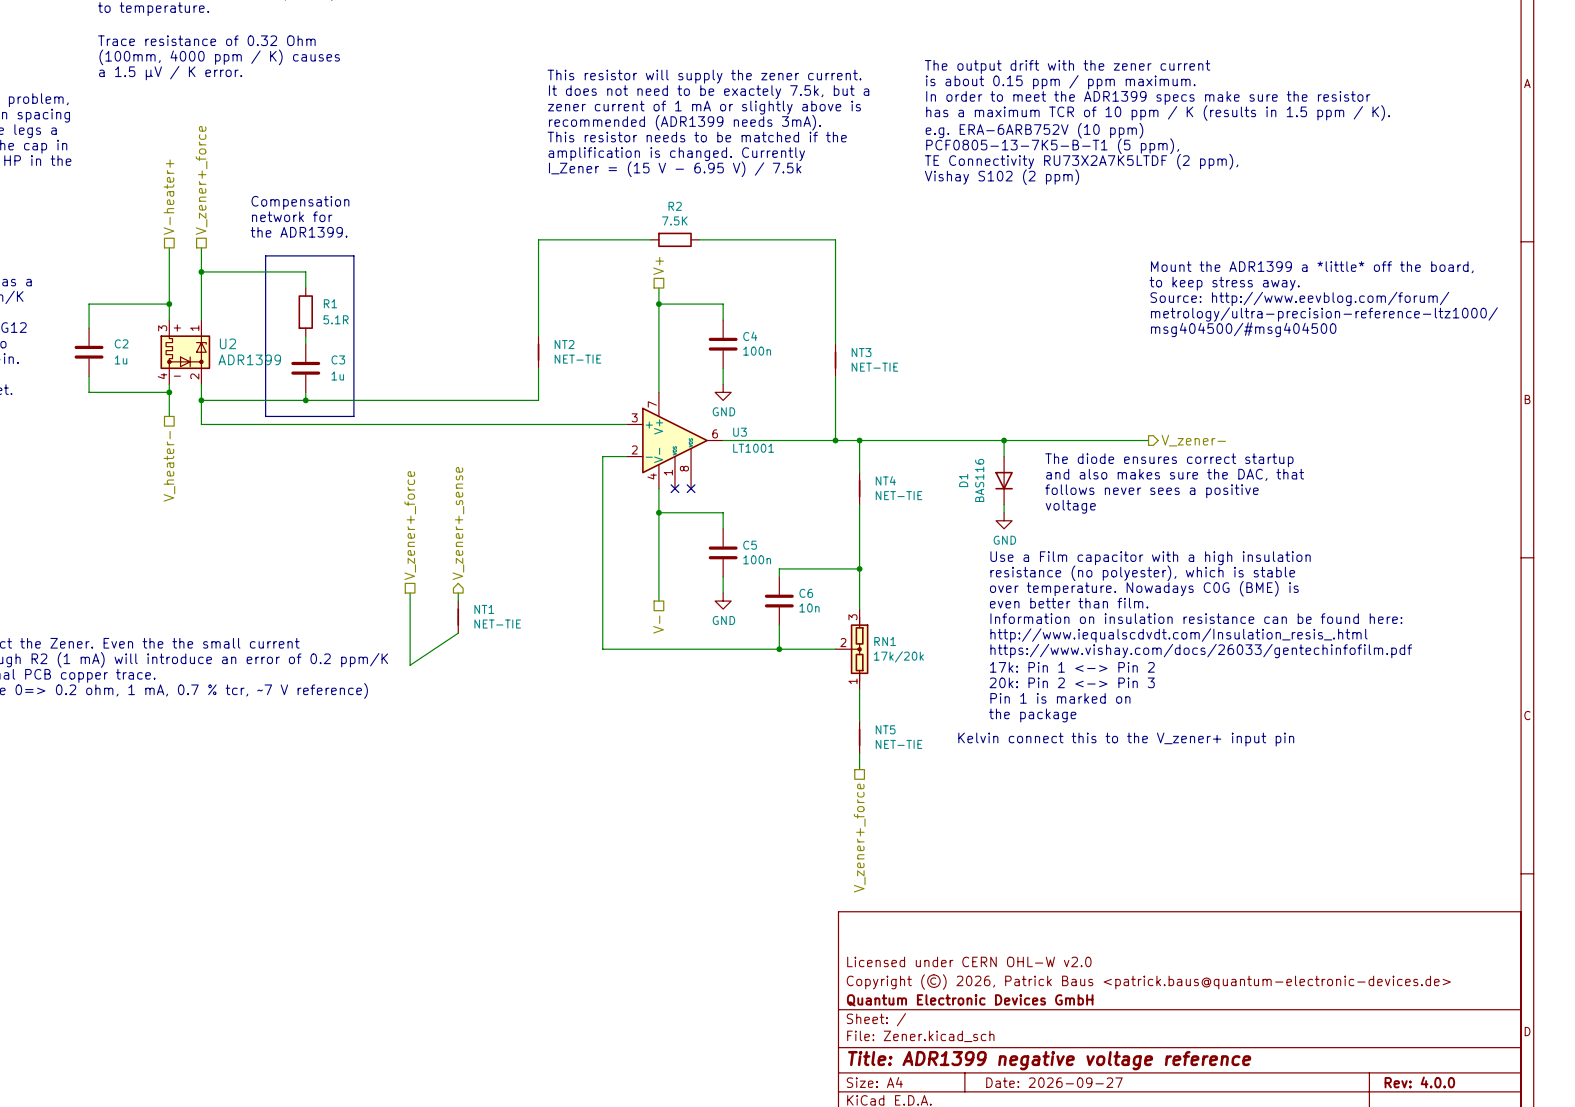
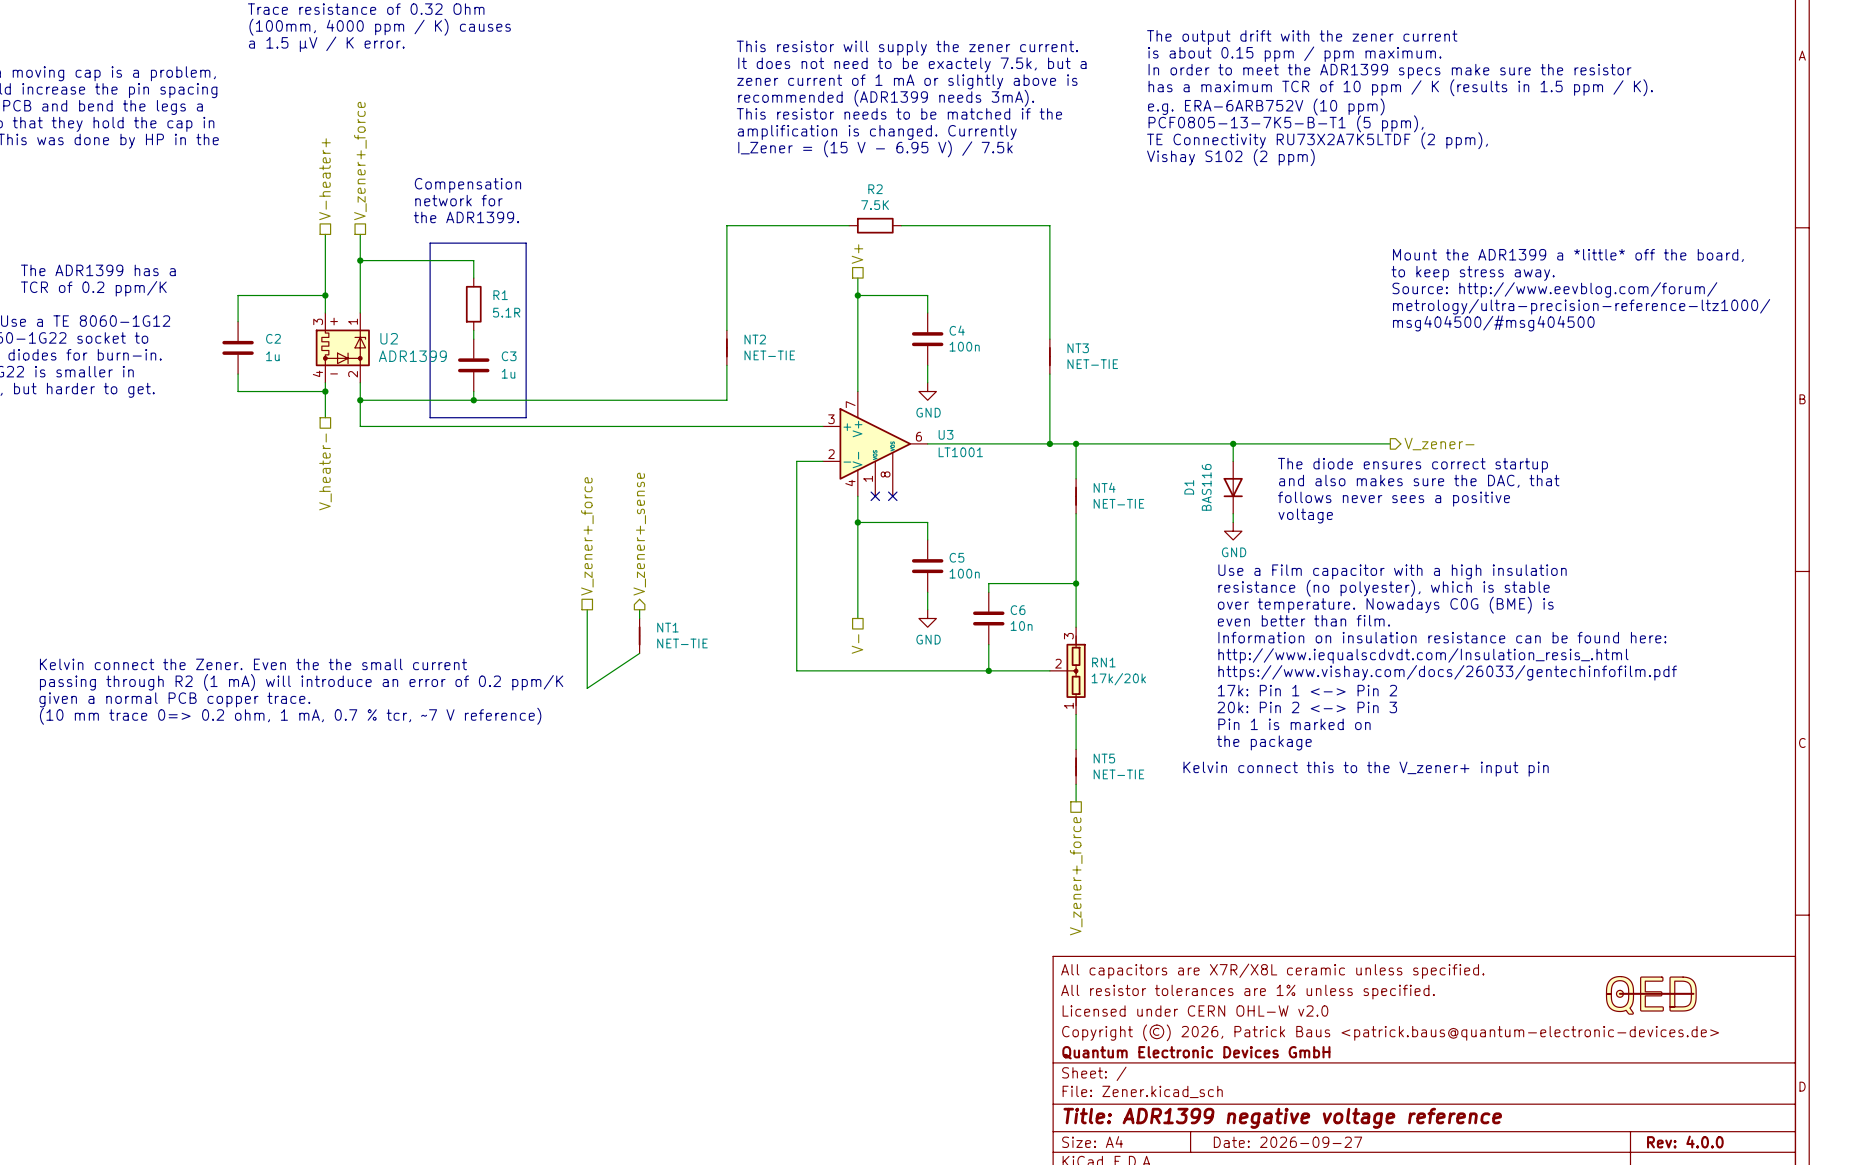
title block: none -> All capacitors are X7R/X8L ceramic unless specified. (1272, 971)
title block: none -> All resistor tolerances are 1% unless specified. (1247, 992)
power symbol: none -> (1651, 995)

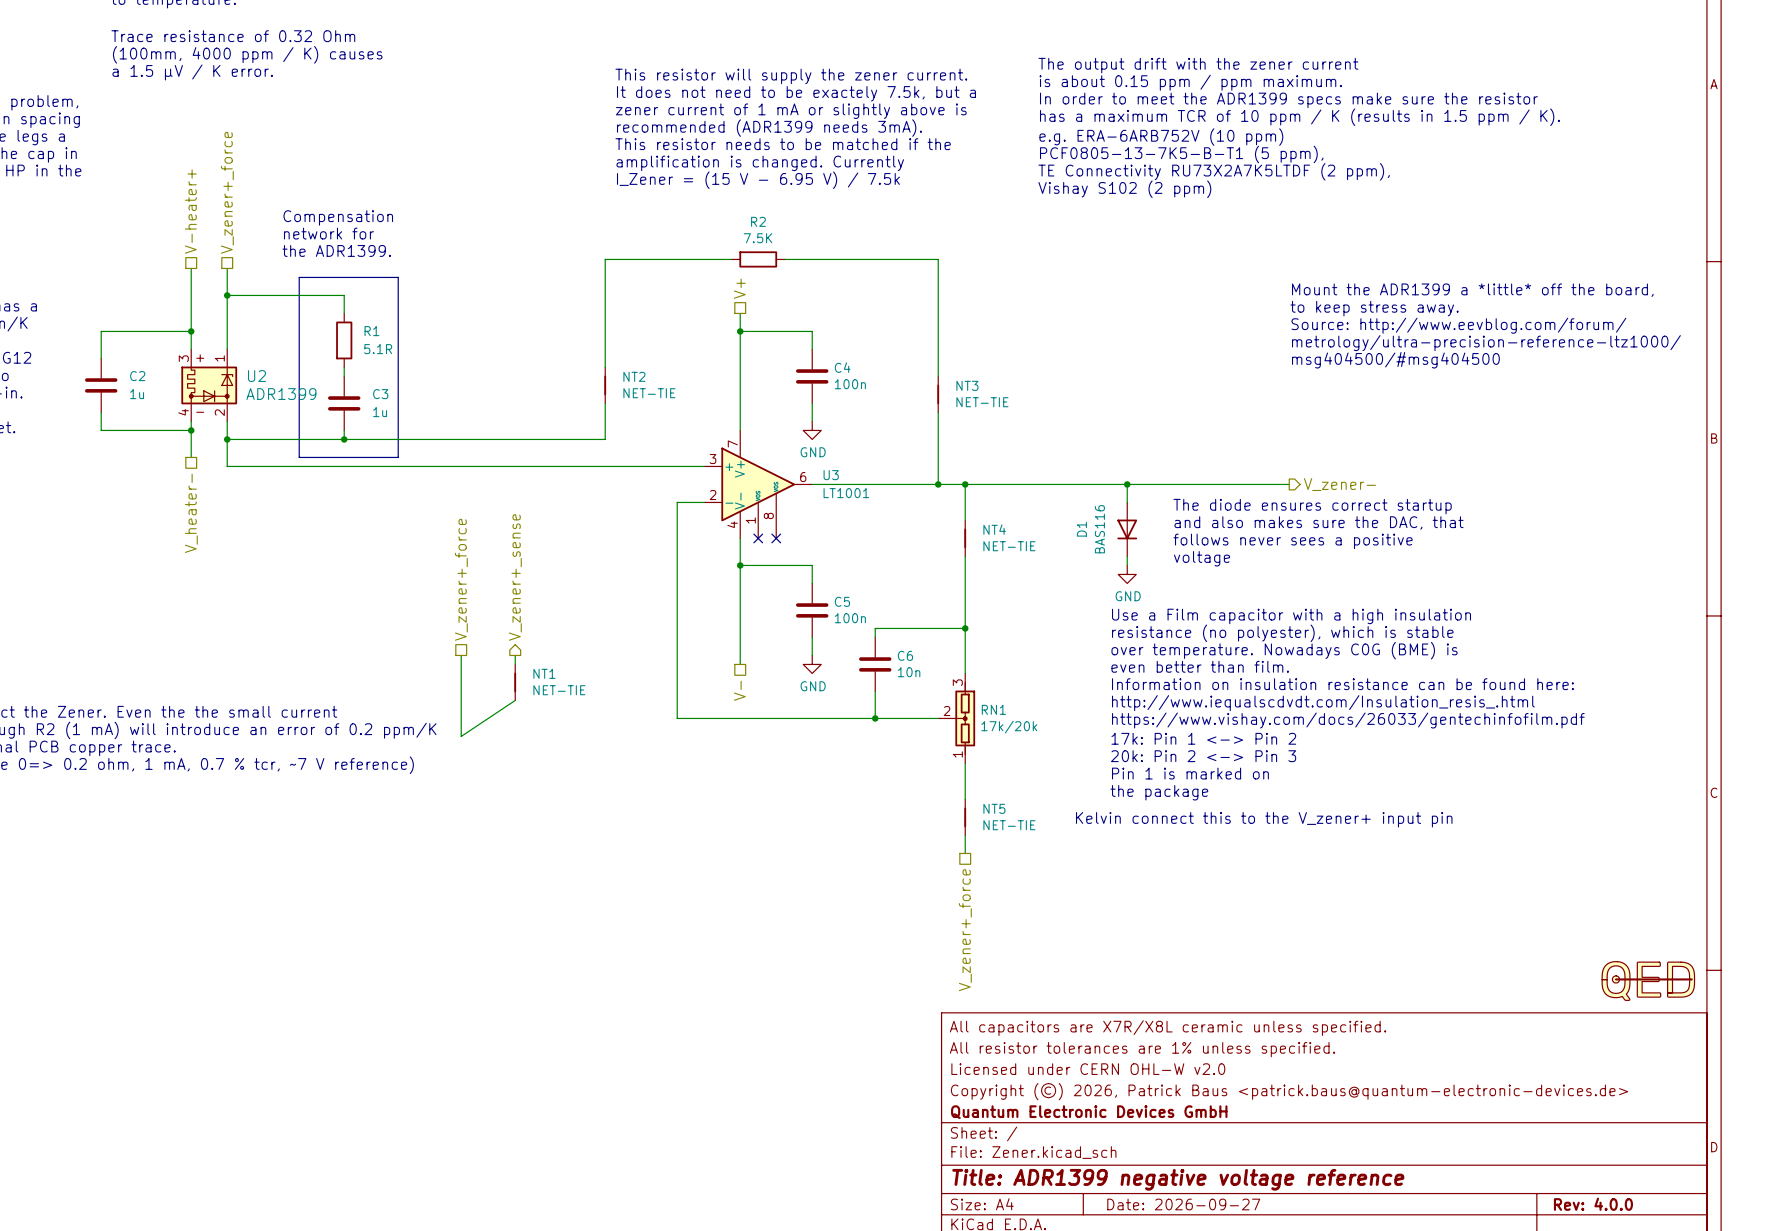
power symbol position: (1651, 995) -> (1648, 981)

